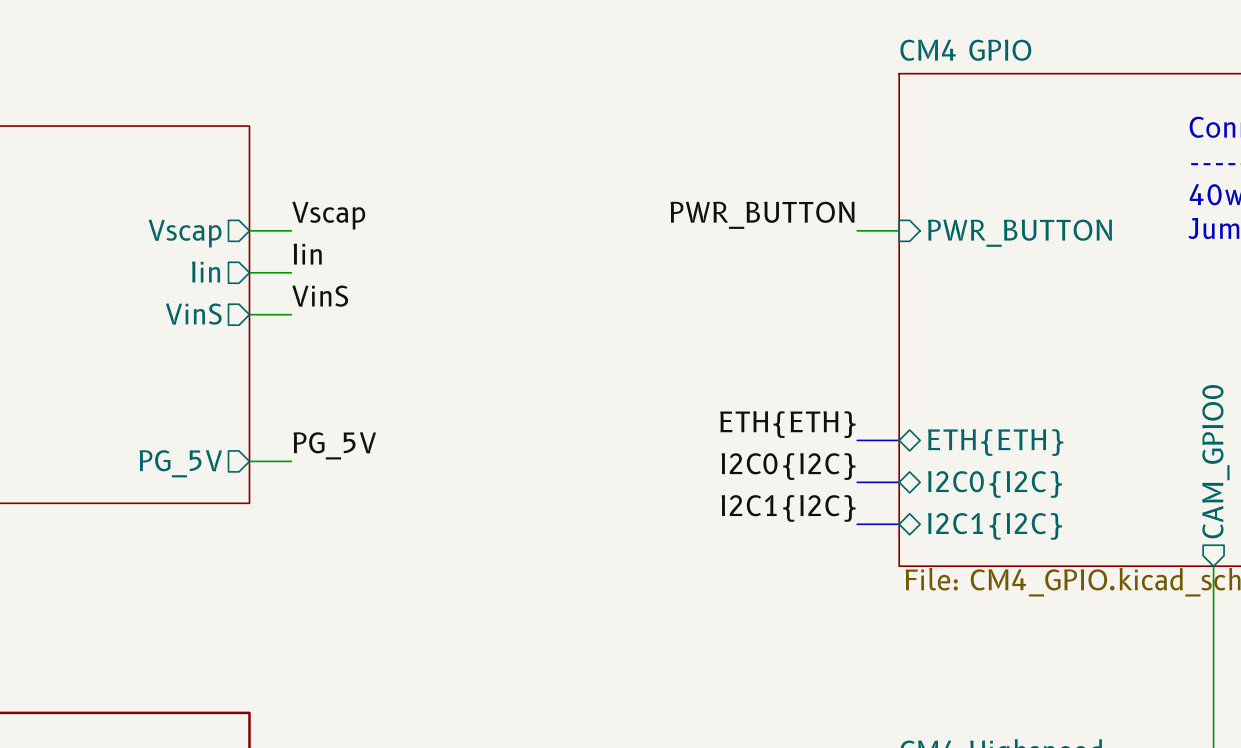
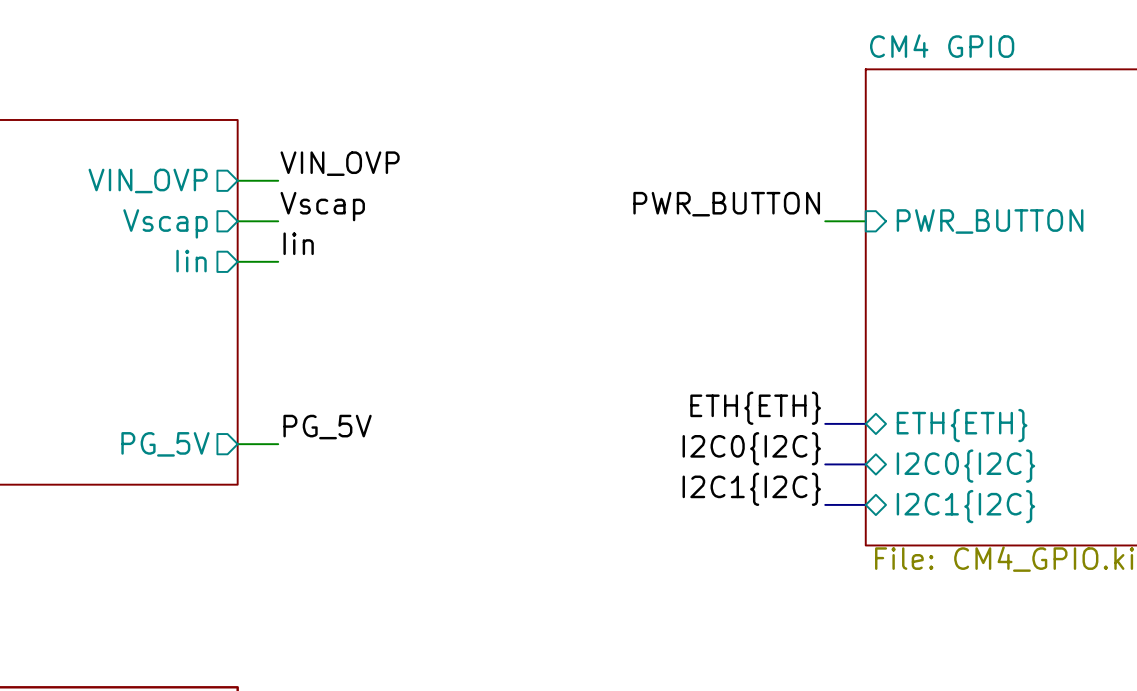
label: none -> VIN_OVP (340, 163)
sheet pin: none -> VIN_OVP (148, 180)
label: VinS (320, 296) -> none
sheet pin: VinS (193, 314) -> none
wire: (249, 314) (291, 314) -> (237, 180) (278, 180)

